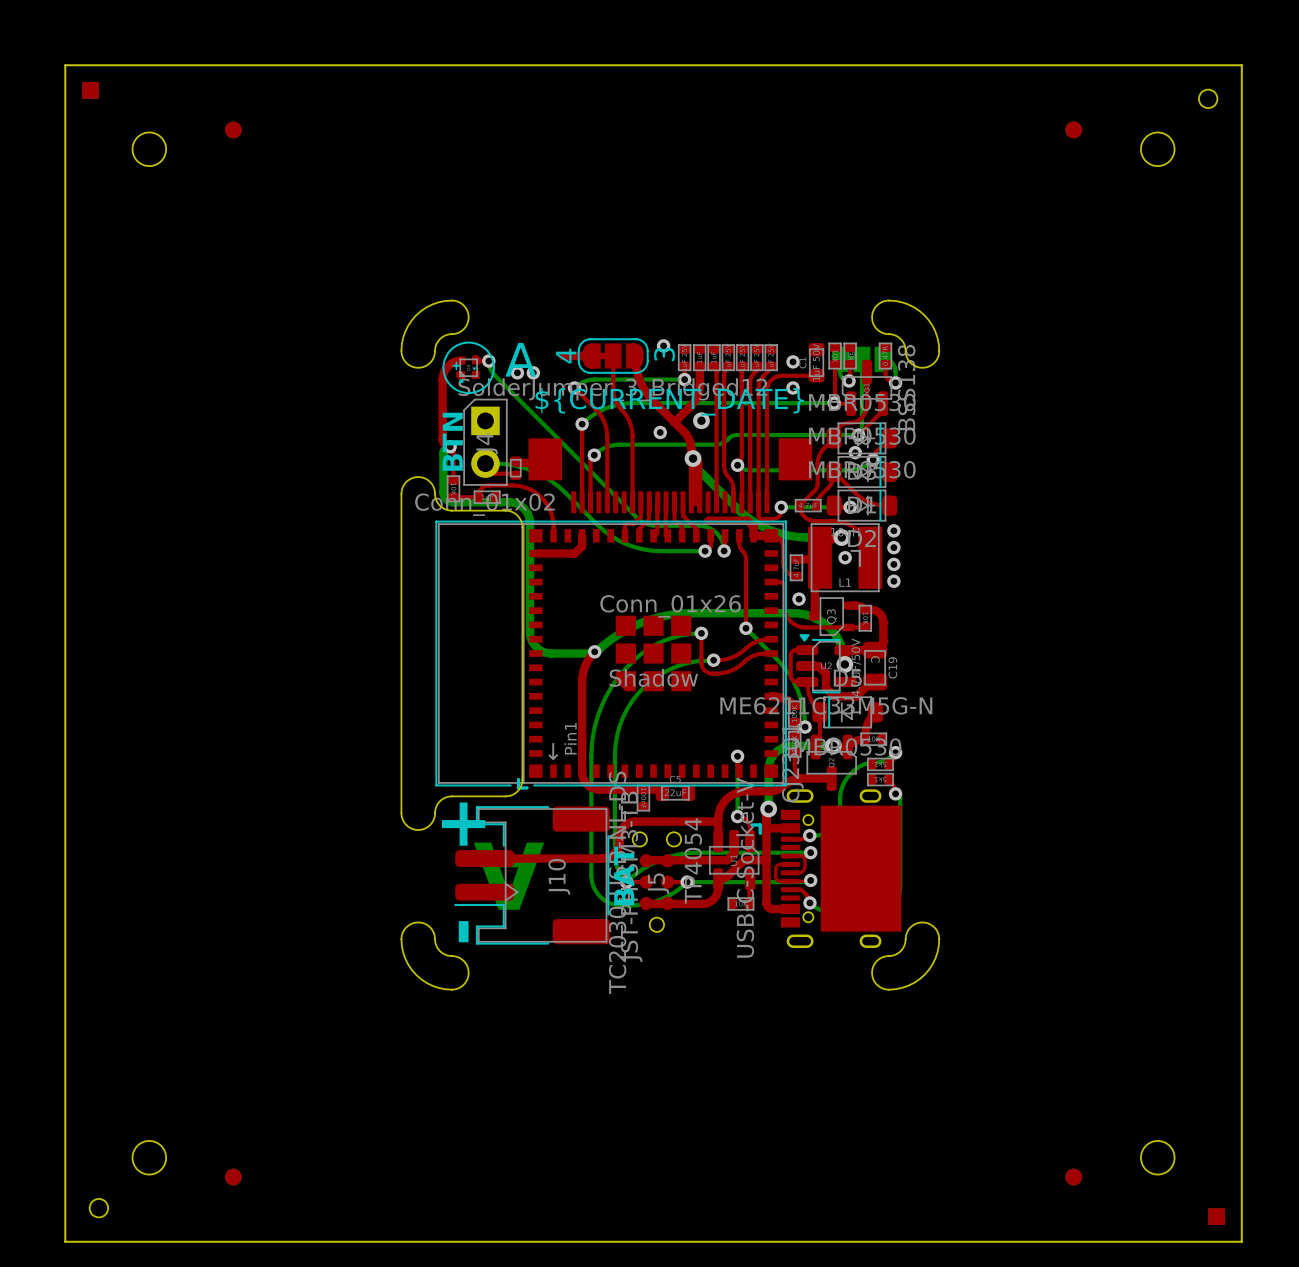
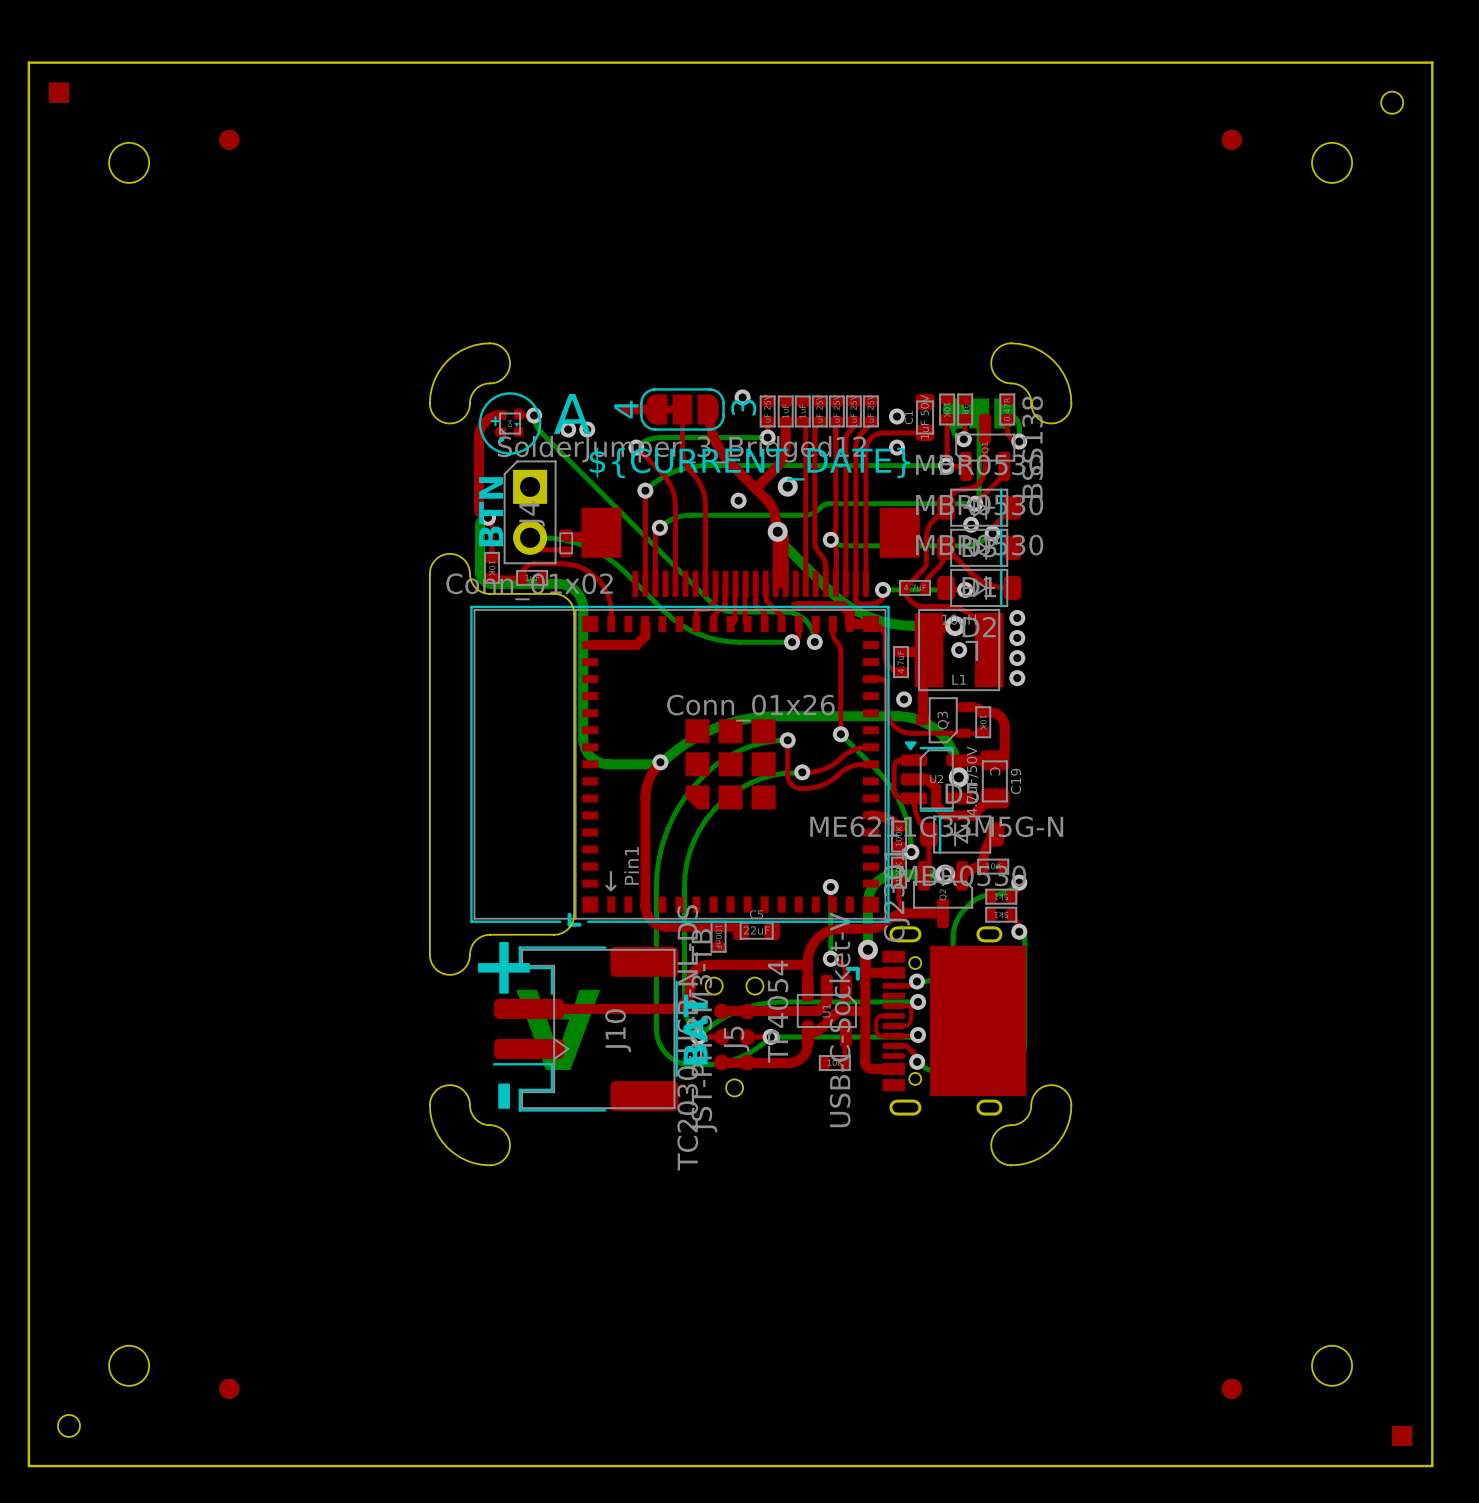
drawing: [609, 668, 699, 687] -> none

